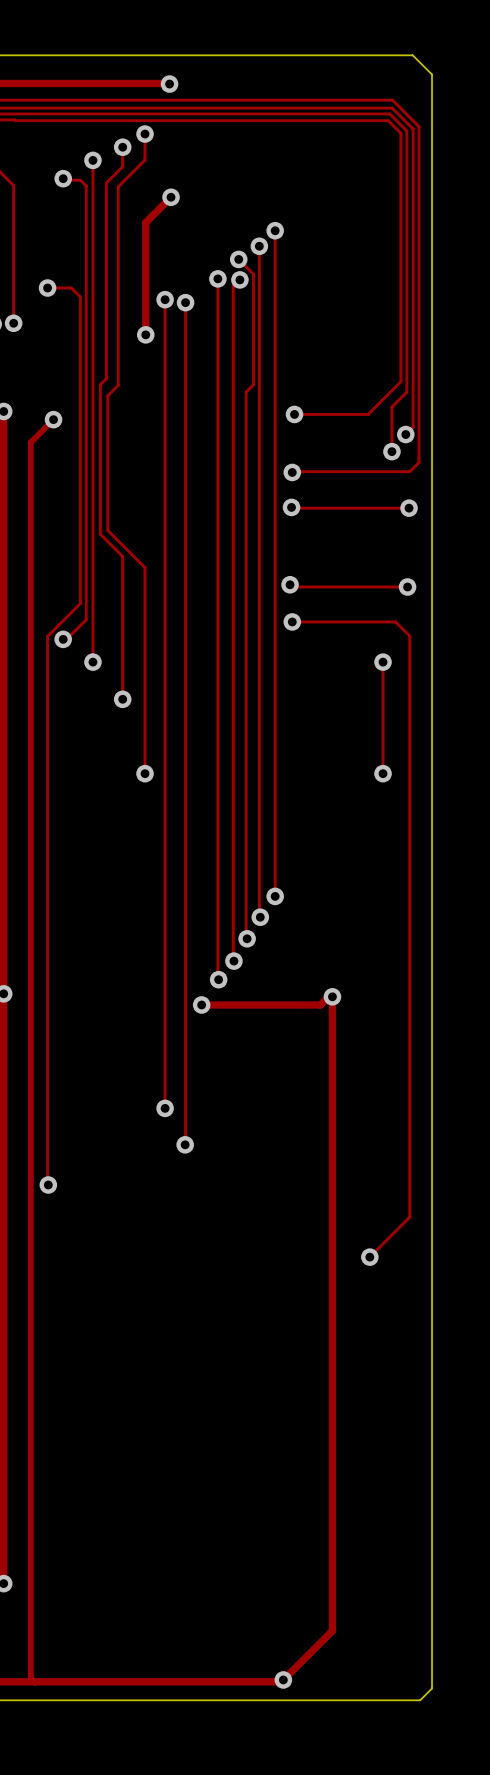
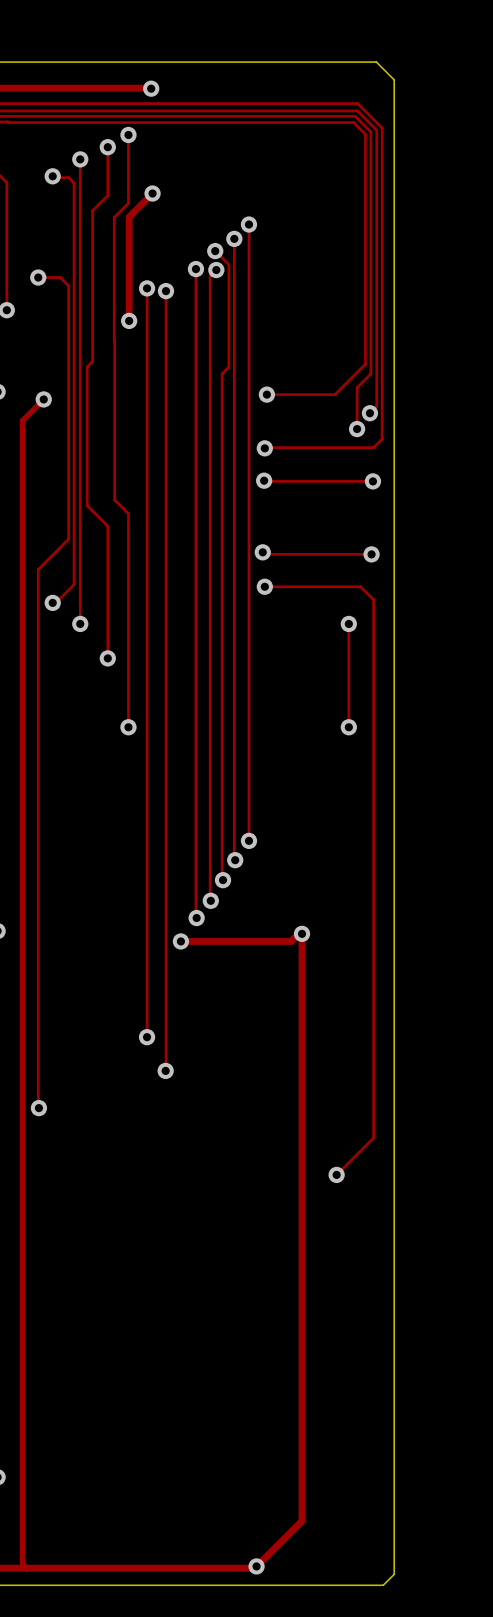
track: (145, 160) (118, 186) (118, 385) (107, 395) (107, 530) (145, 567) -> (128, 159) (128, 203) (114, 217) (114, 499) (128, 513) (128, 536)
track: (122, 166) (106, 183) (106, 215) -> (107, 165) (107, 195) (92, 210)
track: (80, 570) (80, 603) (47, 636) -> (68, 539) (38, 569) (38, 600)

